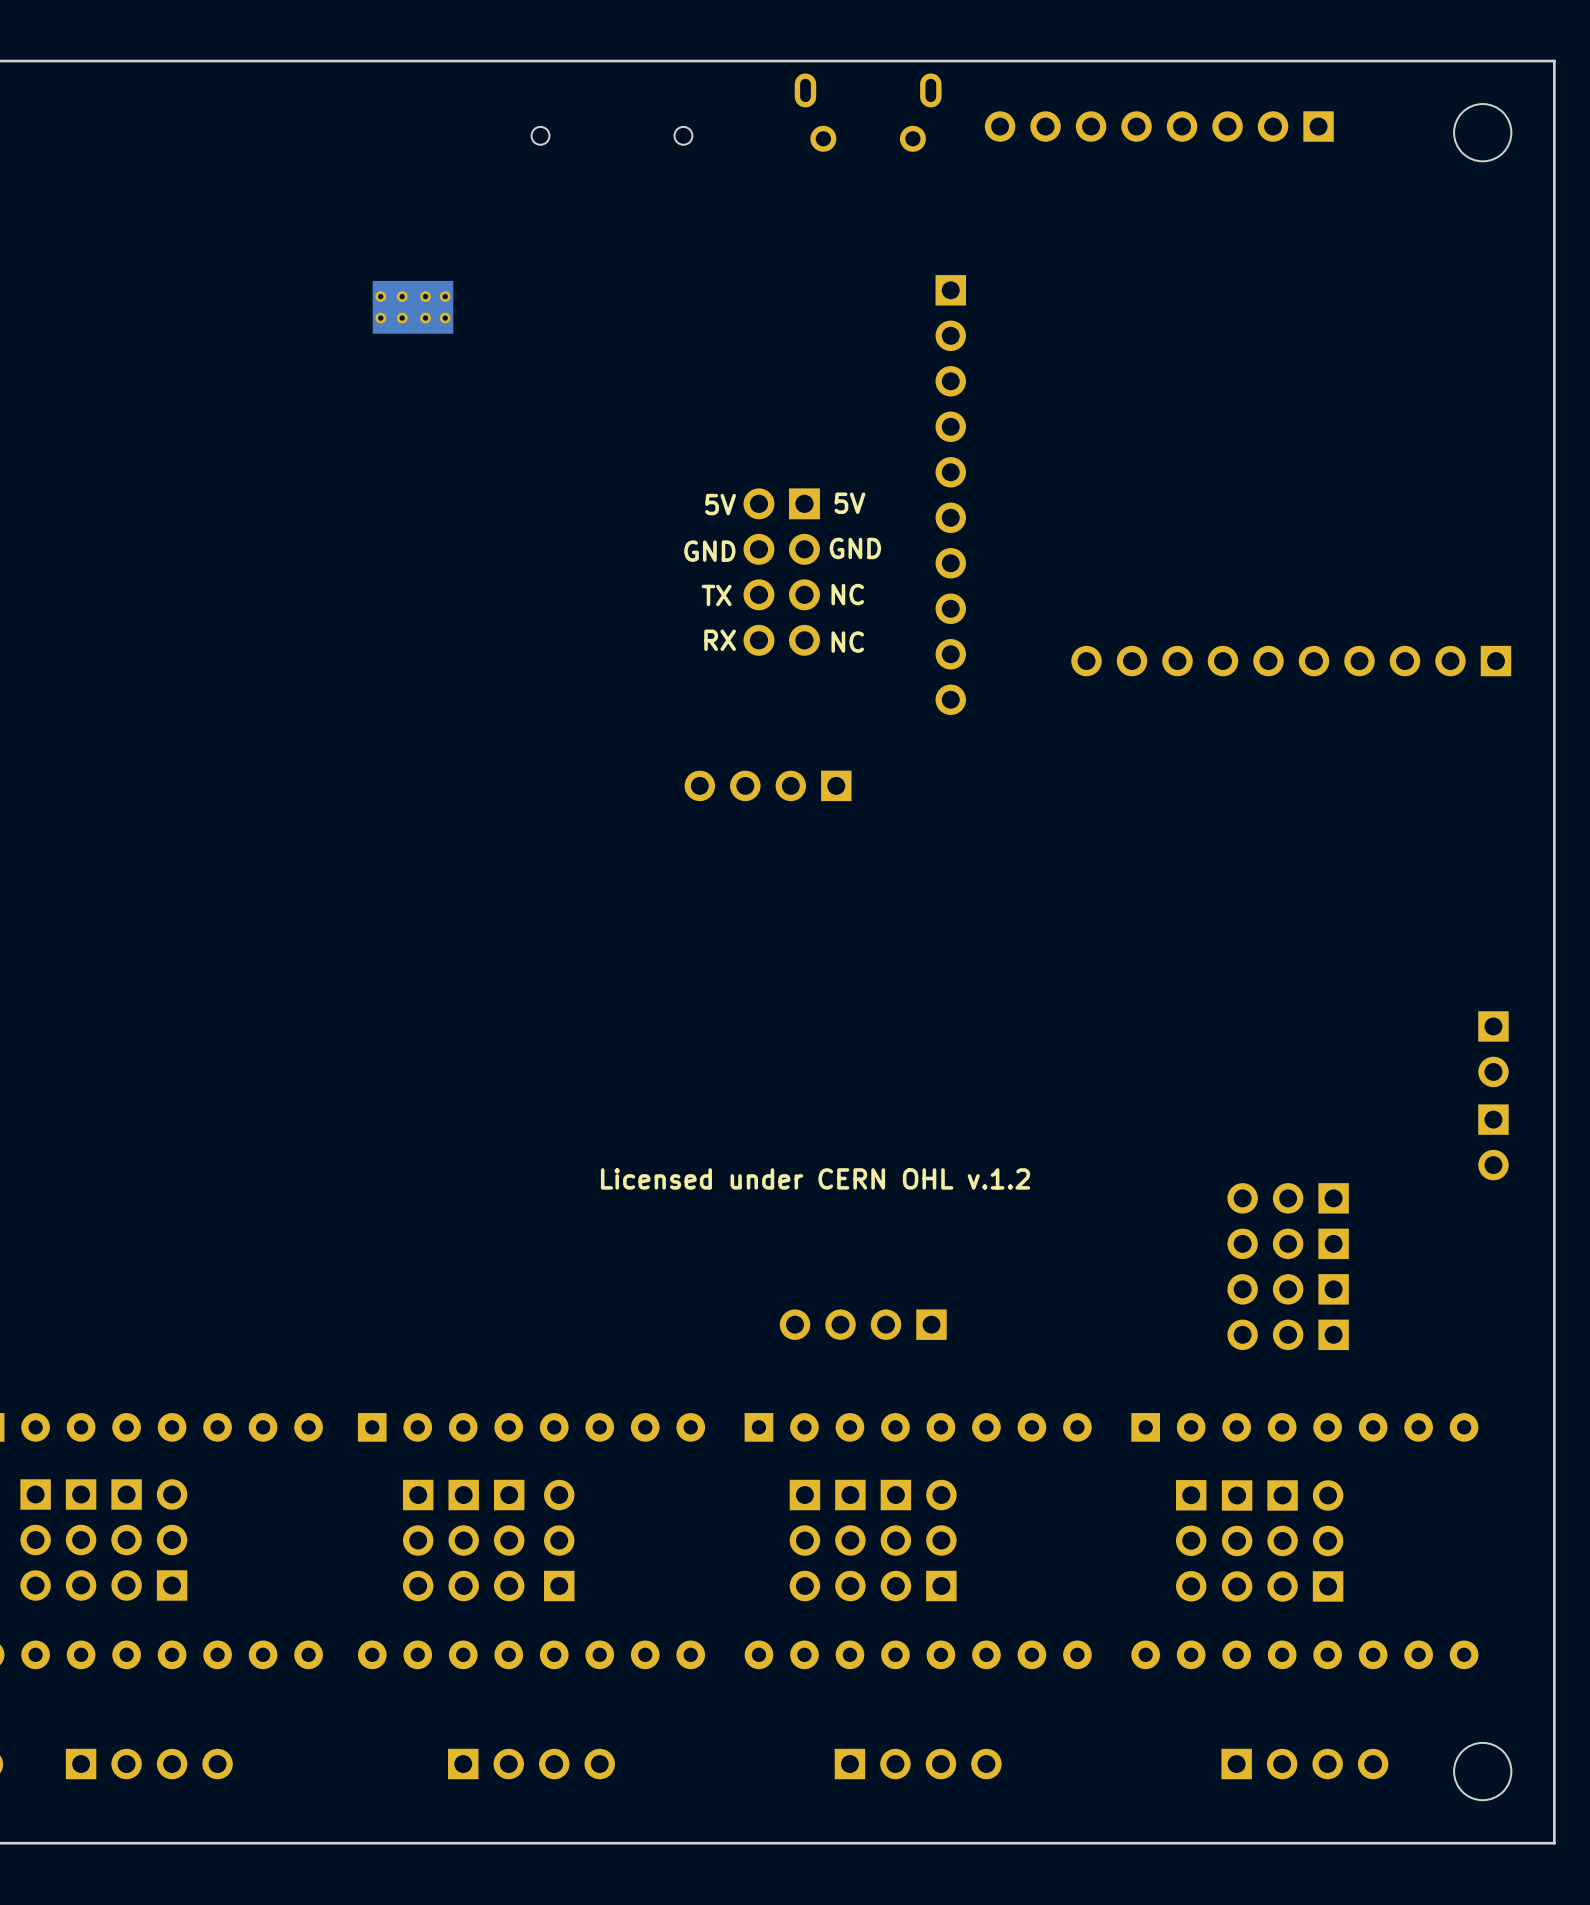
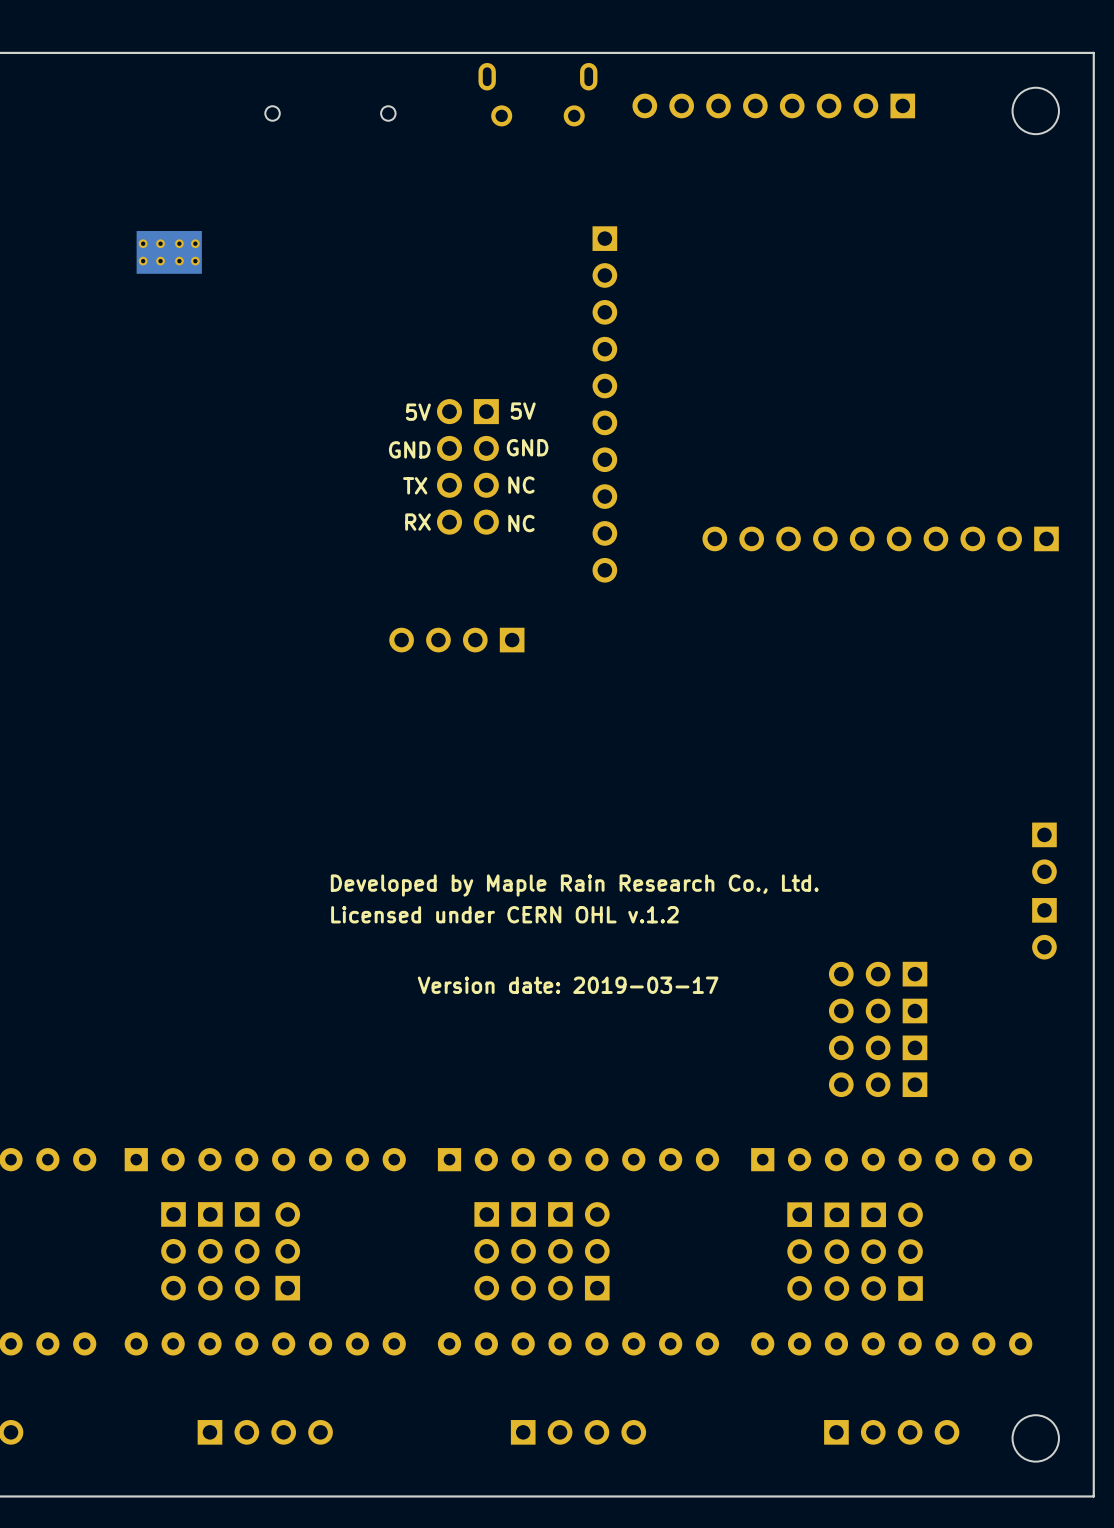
text: none -> Developed by Maple Rain Research Co., Ltd. (574, 885)
text position: Licensed under CERN OHL v.1.2 (815, 1178) -> Licensed under CERN OHL v.1.2 (504, 914)
text: none -> Version date: 2019-03-17 (568, 985)
part: (863, 1324) -> none

